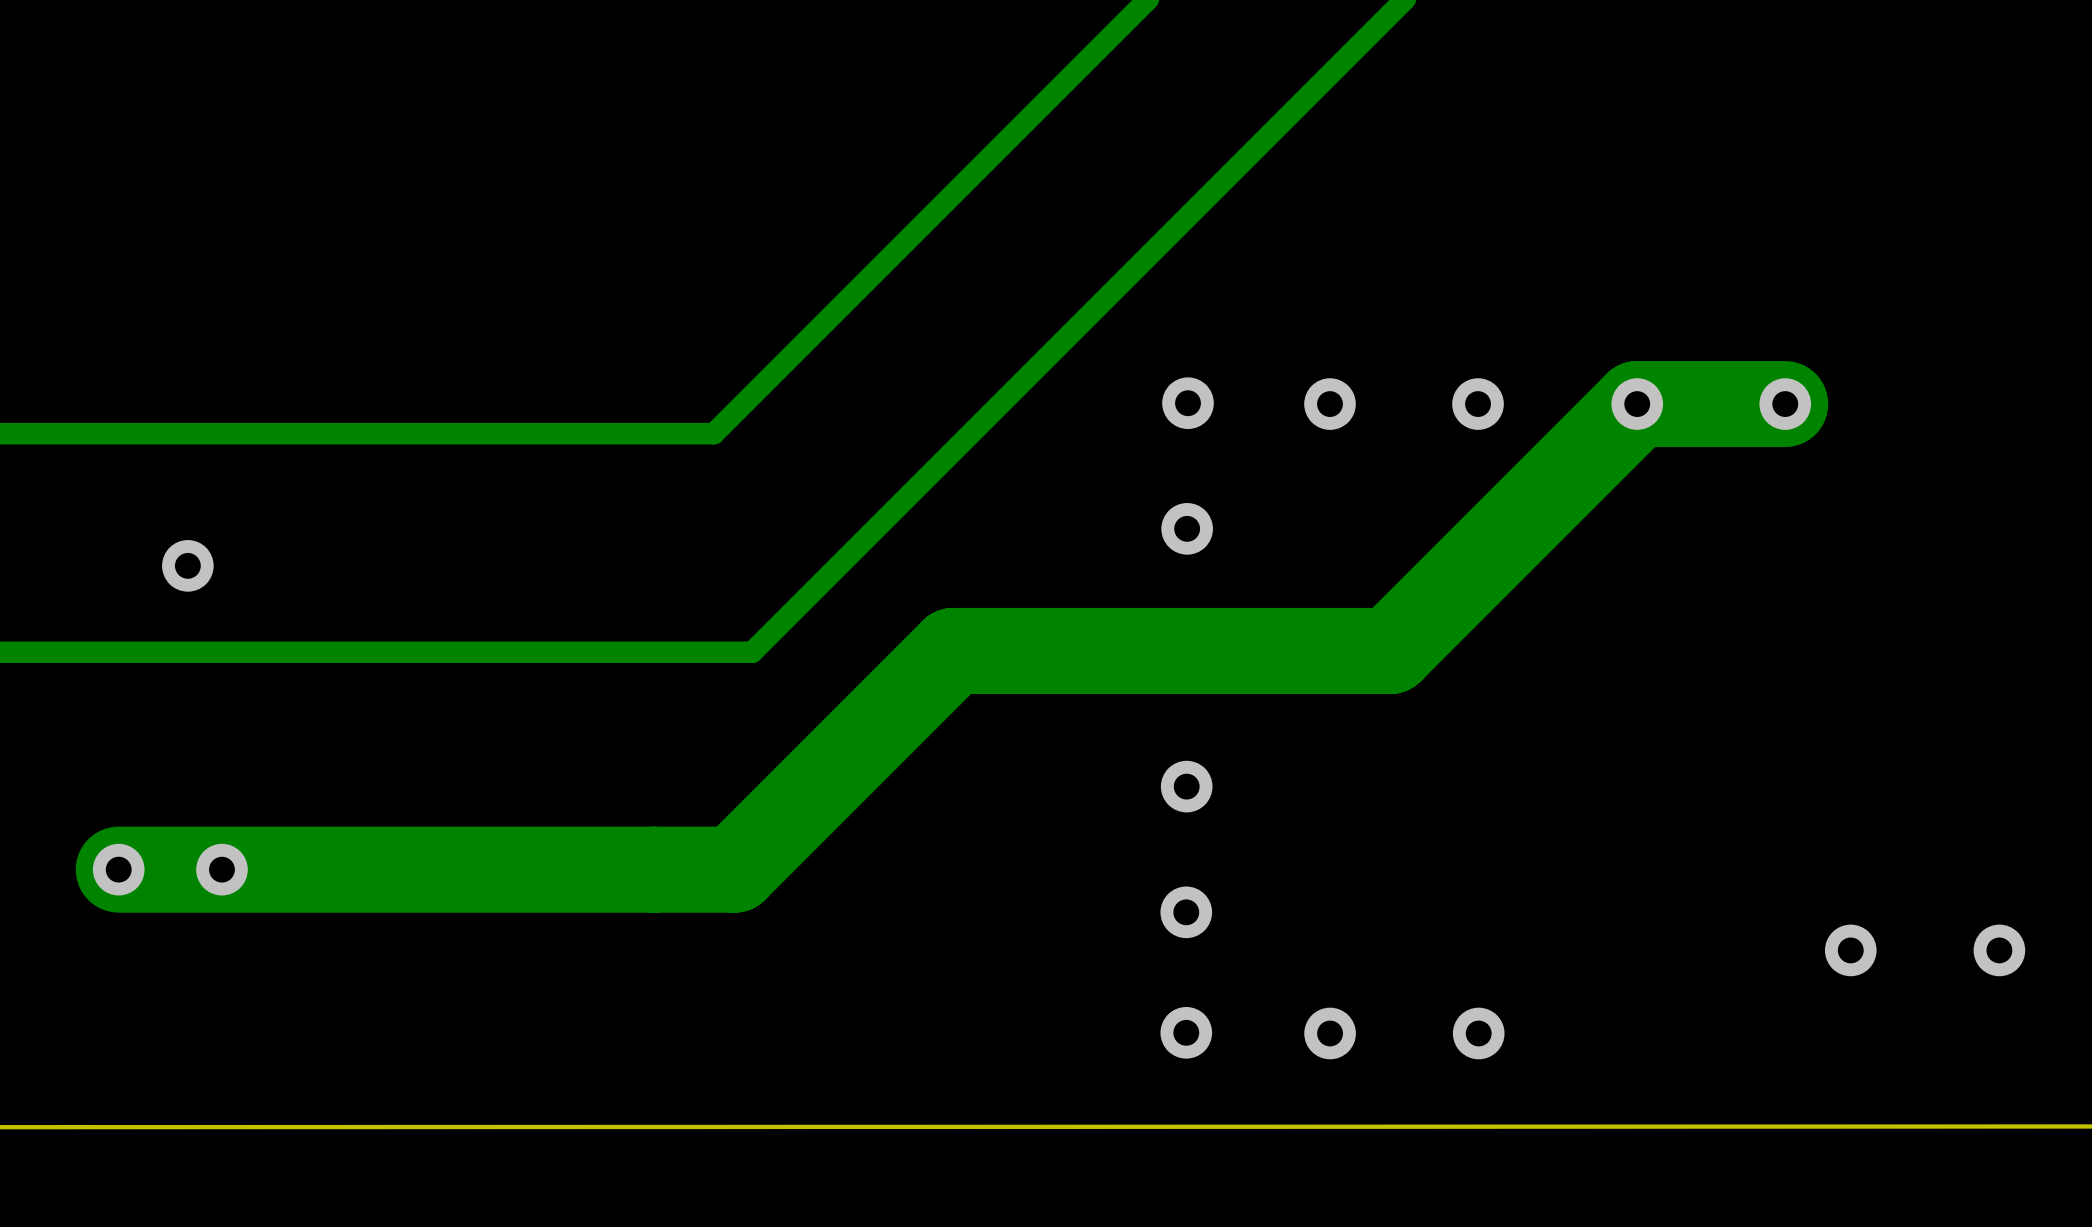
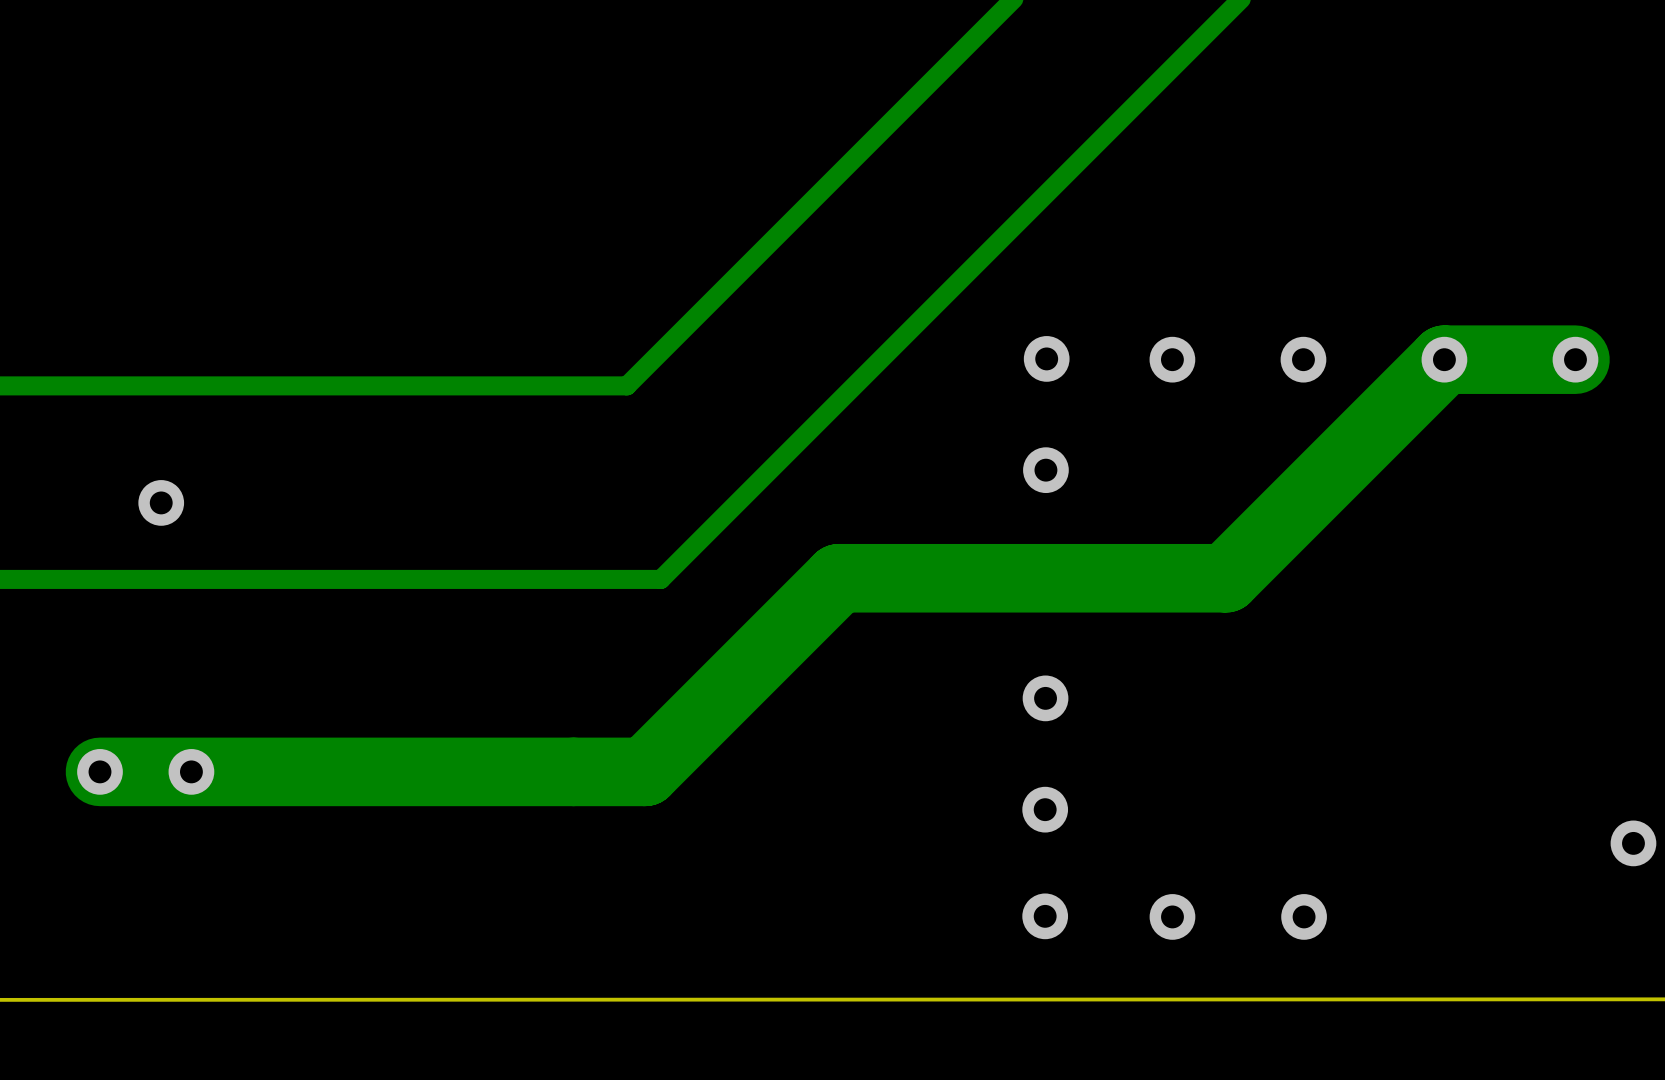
track width: thick (1785, 404) (1637, 404) (1390, 650) (953, 650) (734, 869) (118, 869) -> thin (1575, 359) (1444, 359) (1225, 578) (838, 578) (645, 771) (100, 771)

